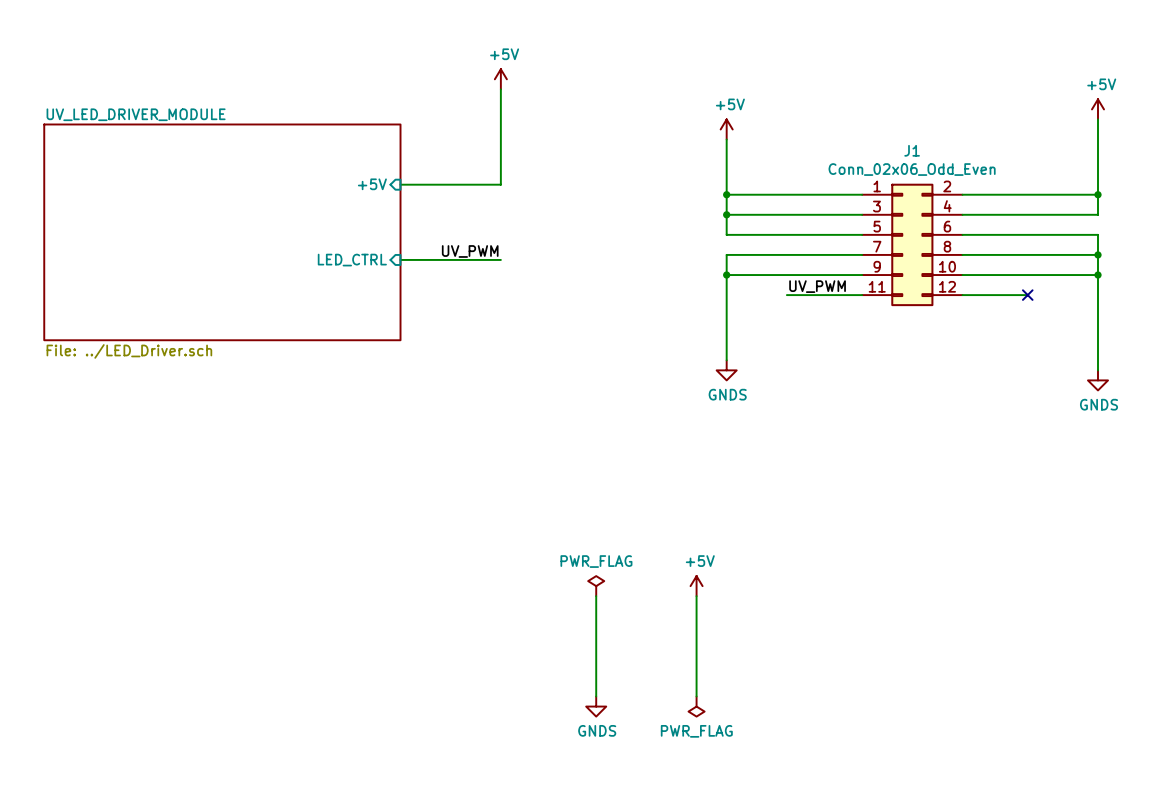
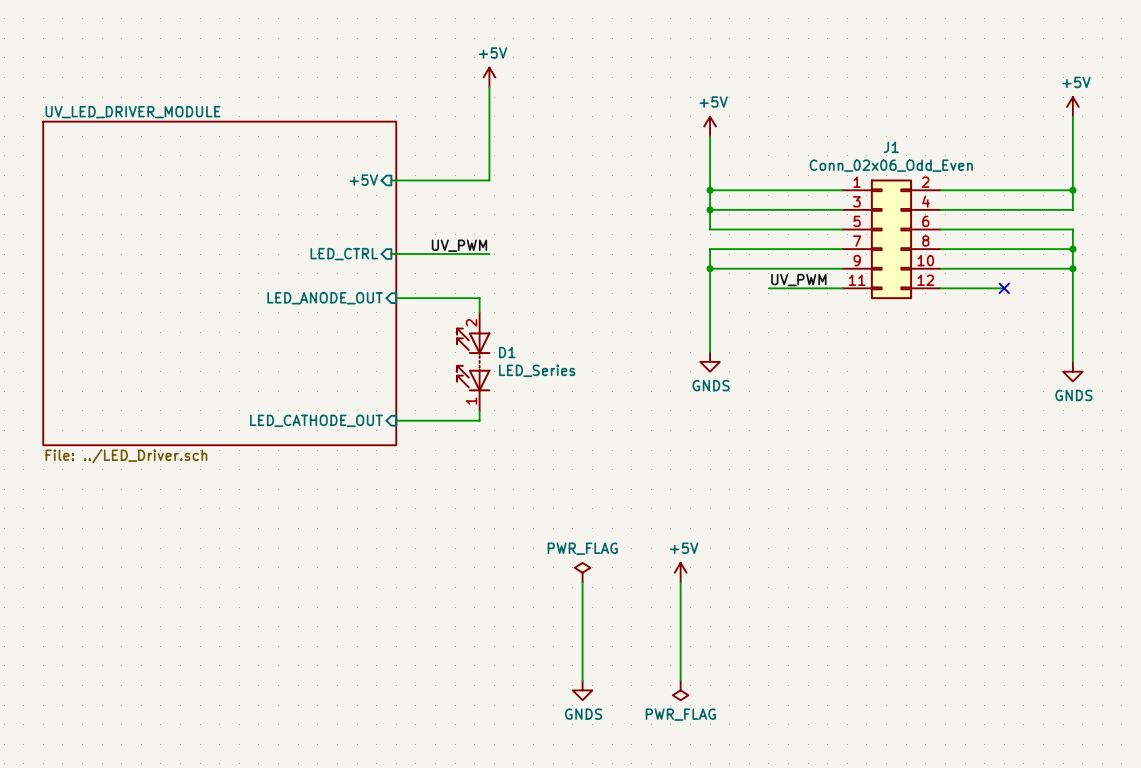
sheet UV_LED_DRIVER_MODULE: File: ../LED_Driver.sch (222, 232) -> none
sheet UV_LED_DRIVER_MODULE: none -> File: ../LED_Driver.sch (219, 283)
sheet pin: none -> LED_ANODE_OUT (325, 298)
wire: none -> (396, 298) (479, 298) (479, 312)
D1: none -> LED_Series (473, 361)
wire: none -> (479, 410) (479, 420) (396, 420)
sheet pin: none -> LED_CATHODE_OUT (316, 420)

